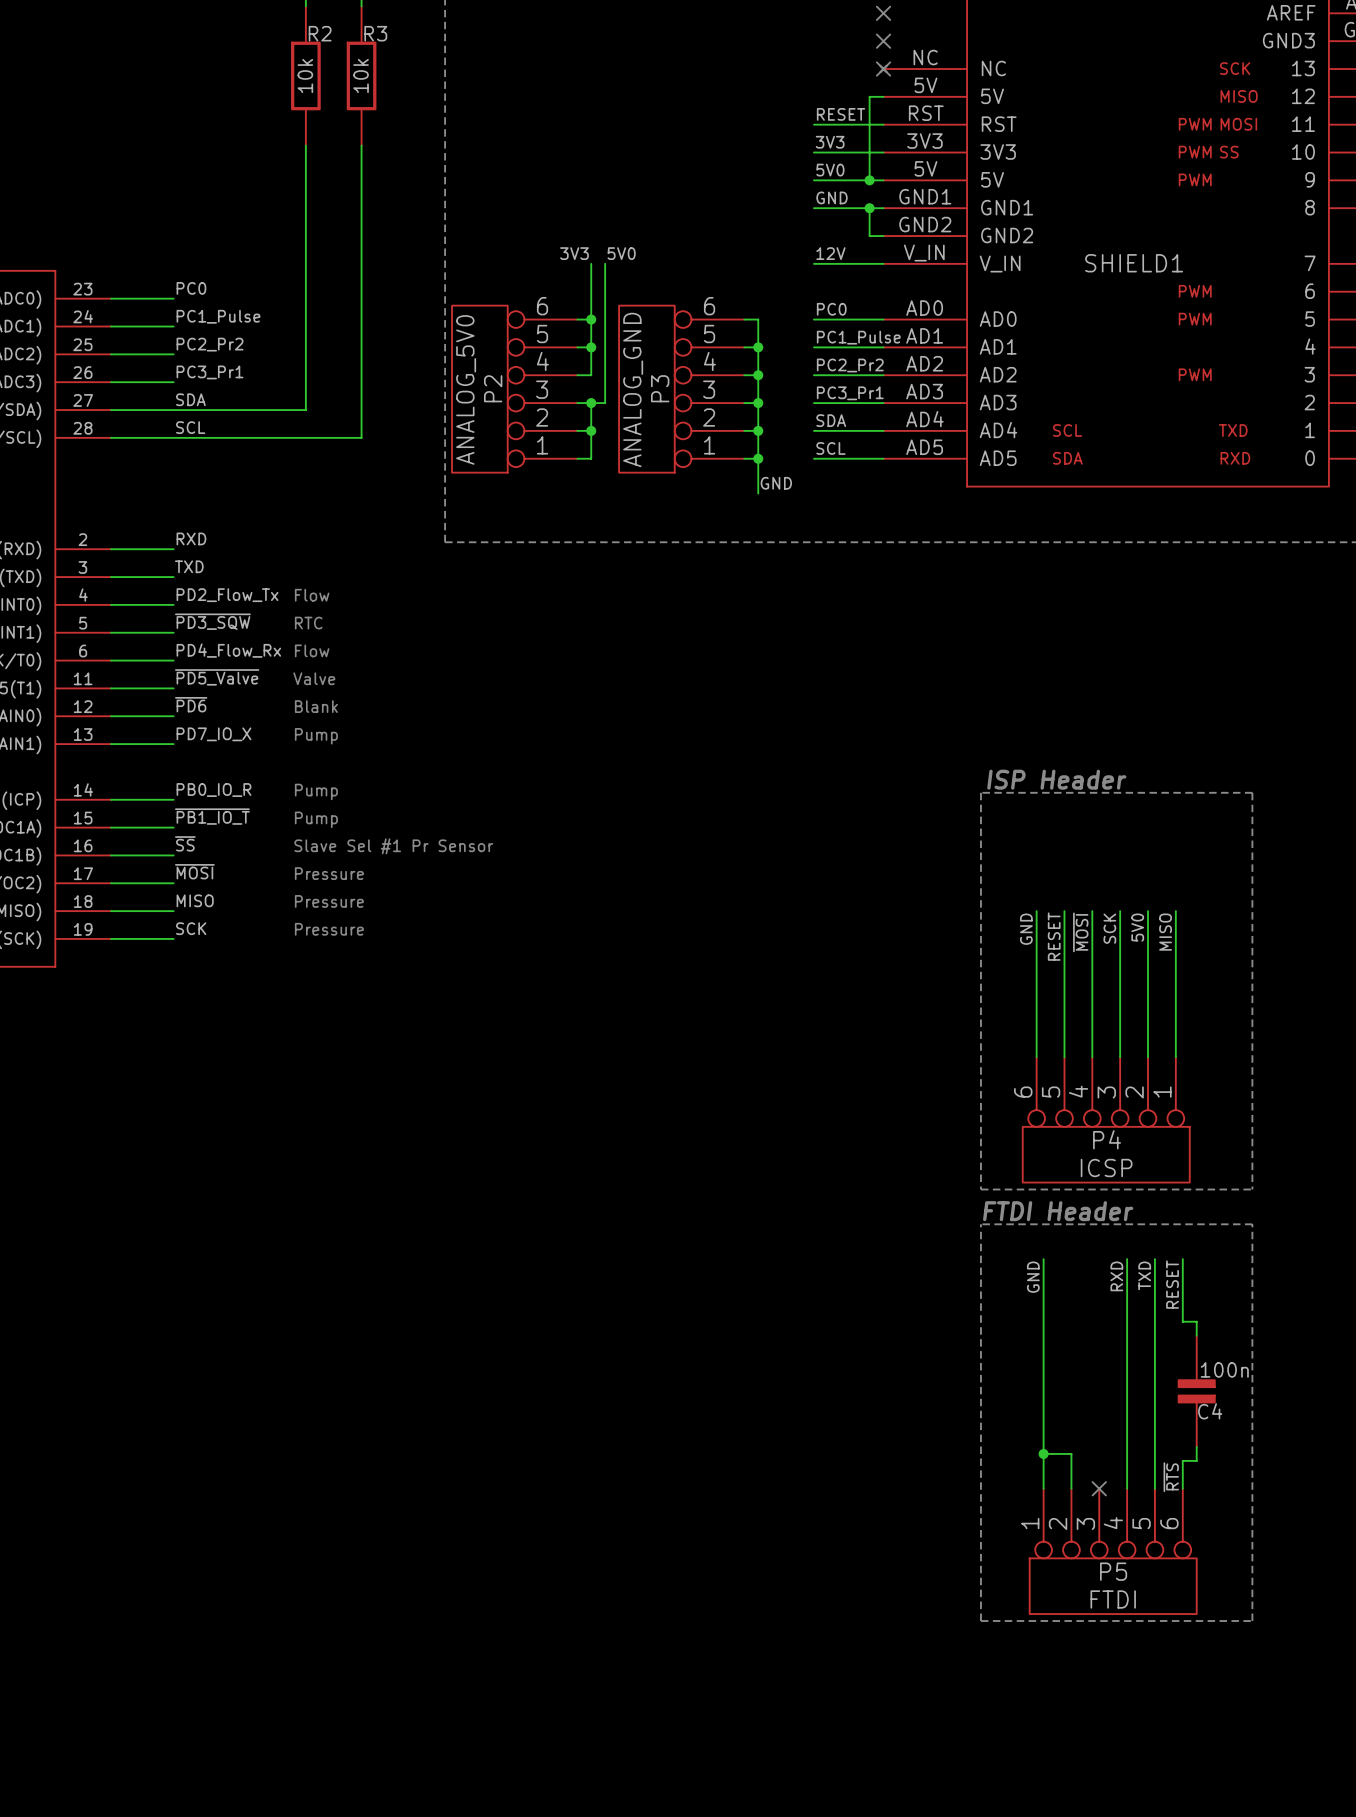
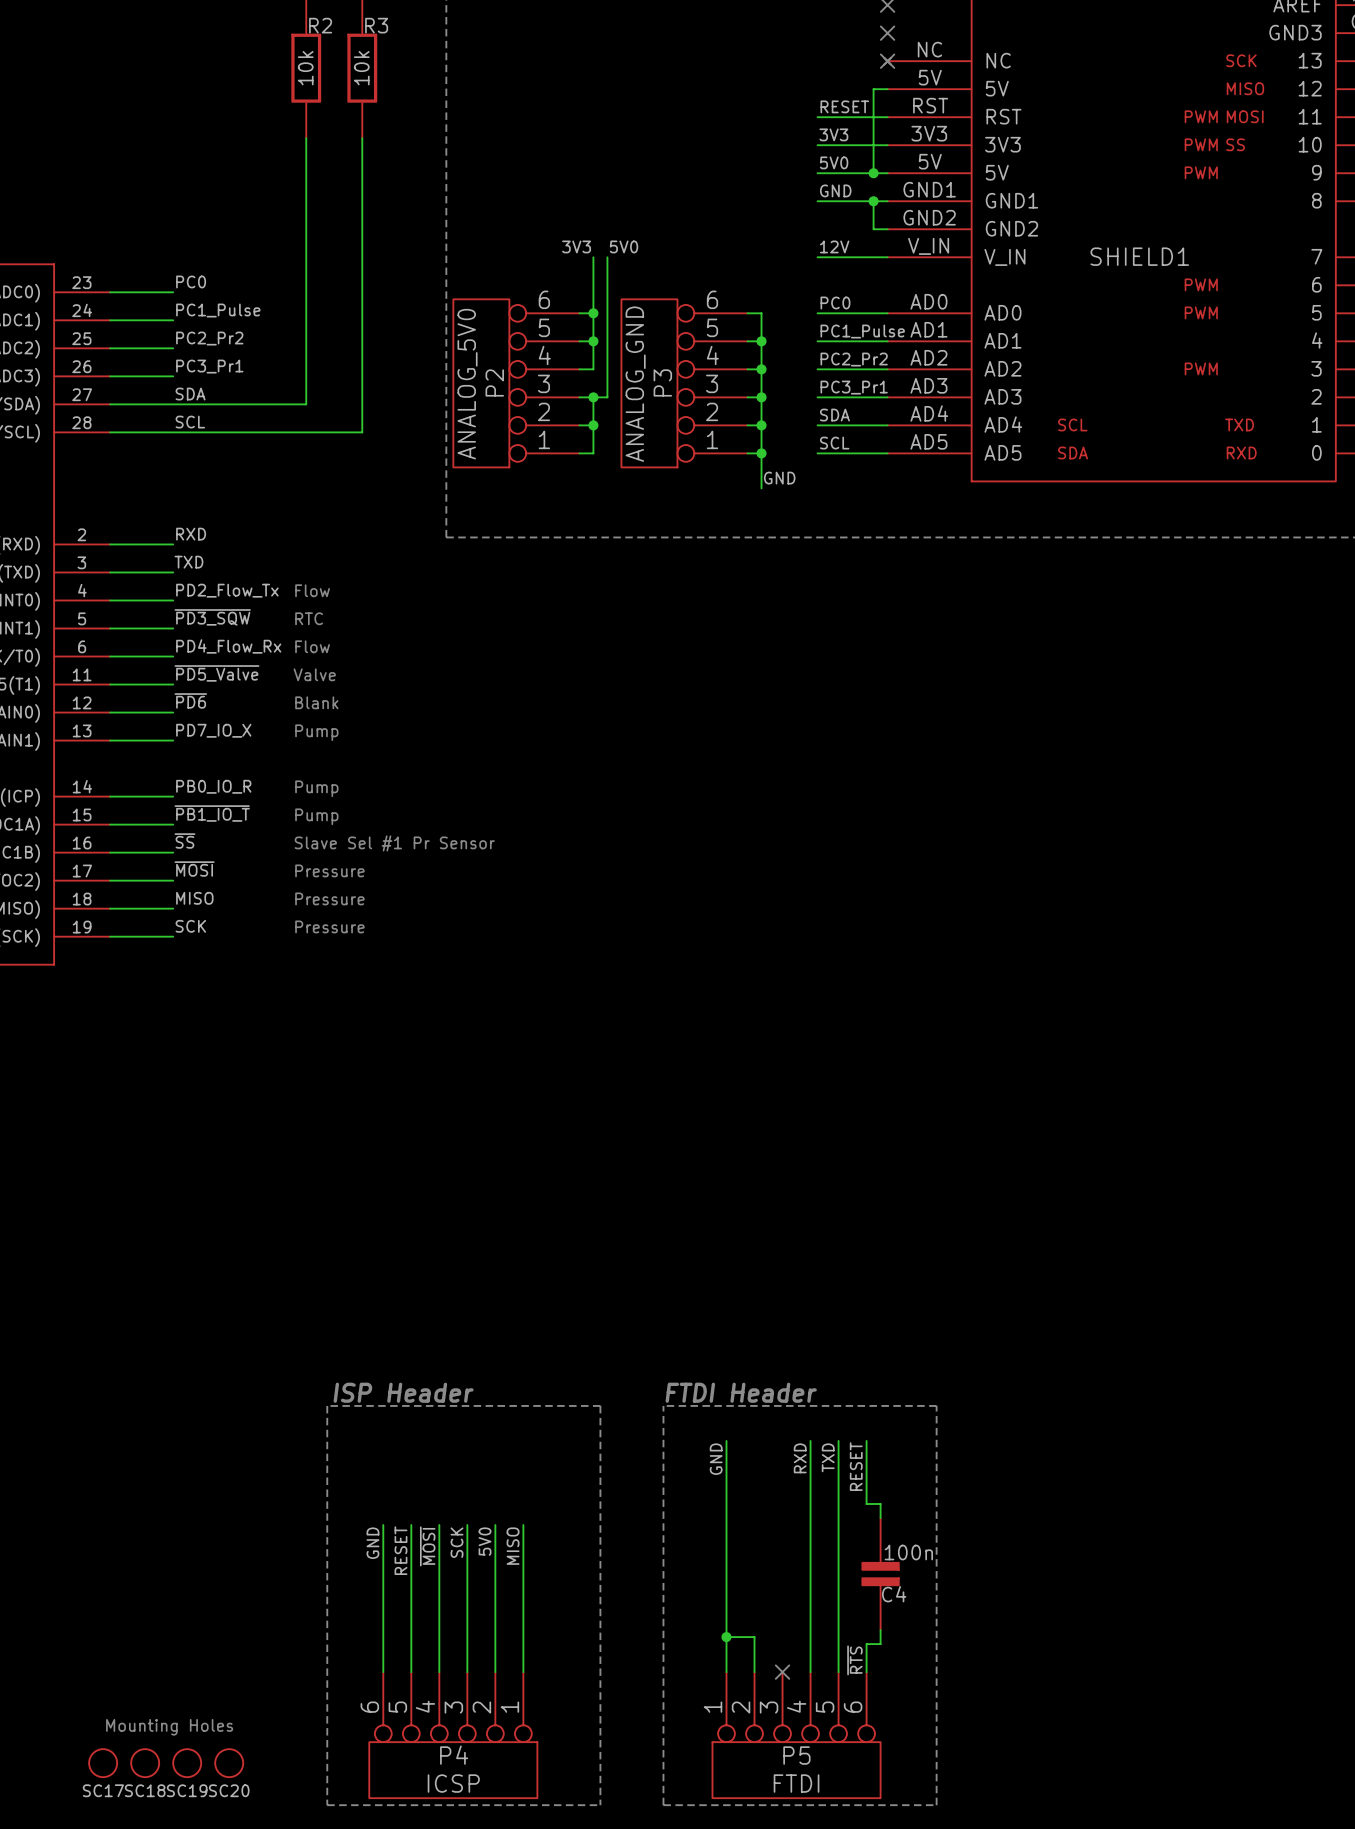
text: ISP Header (1056, 779) -> none
line: (980, 792) (1252, 792) (1252, 1189) (980, 1189) (980, 792) -> none
wire: (1036, 911) (1036, 1057) -> none
wire: (1064, 911) (1064, 1057) -> none
wire: (1092, 911) (1092, 1057) -> none
wire: (1120, 911) (1120, 1057) -> none
wire: (1147, 911) (1147, 1057) -> none
wire: (1175, 911) (1175, 1057) -> none
label: 5V0 (1137, 927) -> none
label: SCK (1109, 928) -> none
label: GND (1026, 929) -> none
label: ~{MOSI} (1080, 932) -> none
label: MISO (1165, 932) -> none
label: RESET (1054, 936) -> none
P4 position: (1106, 1119) -> (453, 1735)
text: FTDI Header (1058, 1211) -> none
line: (980, 1224) (980, 1621) (1252, 1621) (1252, 1224) (980, 1224) -> none
wire: (1043, 1259) (1043, 1488) -> none
wire: (1127, 1259) (1127, 1488) -> none
wire: (1154, 1259) (1154, 1488) -> none
wire: (1182, 1259) (1182, 1321) (1196, 1321) (1196, 1335) -> none
label: TXD (1144, 1275) -> none
label: RXD (1116, 1276) -> none
label: GND (1033, 1277) -> none
label: RESET (1172, 1284) -> none
C4 position: (1196, 1391) -> (880, 1574)
text: none -> ISP Header (403, 1392)
text: none -> FTDI Header (741, 1392)
line: none -> (327, 1405) (600, 1405) (600, 1805) (327, 1805) (327, 1405)
line: none -> (663, 1405) (936, 1405) (936, 1805) (663, 1805) (663, 1405)
wire: none -> (726, 1440) (726, 1672)
wire: none -> (810, 1440) (810, 1672)
wire: none -> (838, 1440) (838, 1672)
wire: none -> (866, 1440) (866, 1504) (880, 1504) (880, 1518)
wire: (1196, 1447) (1196, 1460) (1182, 1460) (1182, 1488) -> none
wire: (1043, 1453) (1071, 1453) (1071, 1488) -> none
junction: (1043, 1453) -> none
label: none -> TXD (828, 1457)
label: none -> RXD (800, 1458)
label: none -> GND (716, 1459)
label: none -> RESET (856, 1466)
label: ~{RTS} (1171, 1477) -> none
no-connect mark: (1099, 1488) -> none
wire: none -> (383, 1525) (383, 1672)
wire: none -> (411, 1525) (411, 1672)
wire: none -> (439, 1525) (439, 1672)
wire: none -> (467, 1525) (467, 1672)
wire: none -> (495, 1525) (495, 1672)
wire: none -> (523, 1525) (523, 1672)
label: none -> 5V0 (485, 1541)
label: none -> GND (372, 1543)
label: none -> SCK (457, 1542)
label: none -> ~{MOSI} (427, 1546)
label: none -> MISO (513, 1546)
label: none -> RESET (400, 1550)
P5 position: (1113, 1551) -> (796, 1735)
wire: none -> (880, 1630) (880, 1644) (866, 1644) (866, 1672)
wire: none -> (726, 1637) (754, 1637) (754, 1672)
junction: none -> (726, 1637)
label: none -> ~{RTS} (854, 1660)
no-connect mark: none -> (782, 1672)
text: none -> Mounting Holes (169, 1727)
SC17: none -> (103, 1763)
SC18: none -> (145, 1763)
SC19: none -> (187, 1763)
SC20: none -> (229, 1763)

